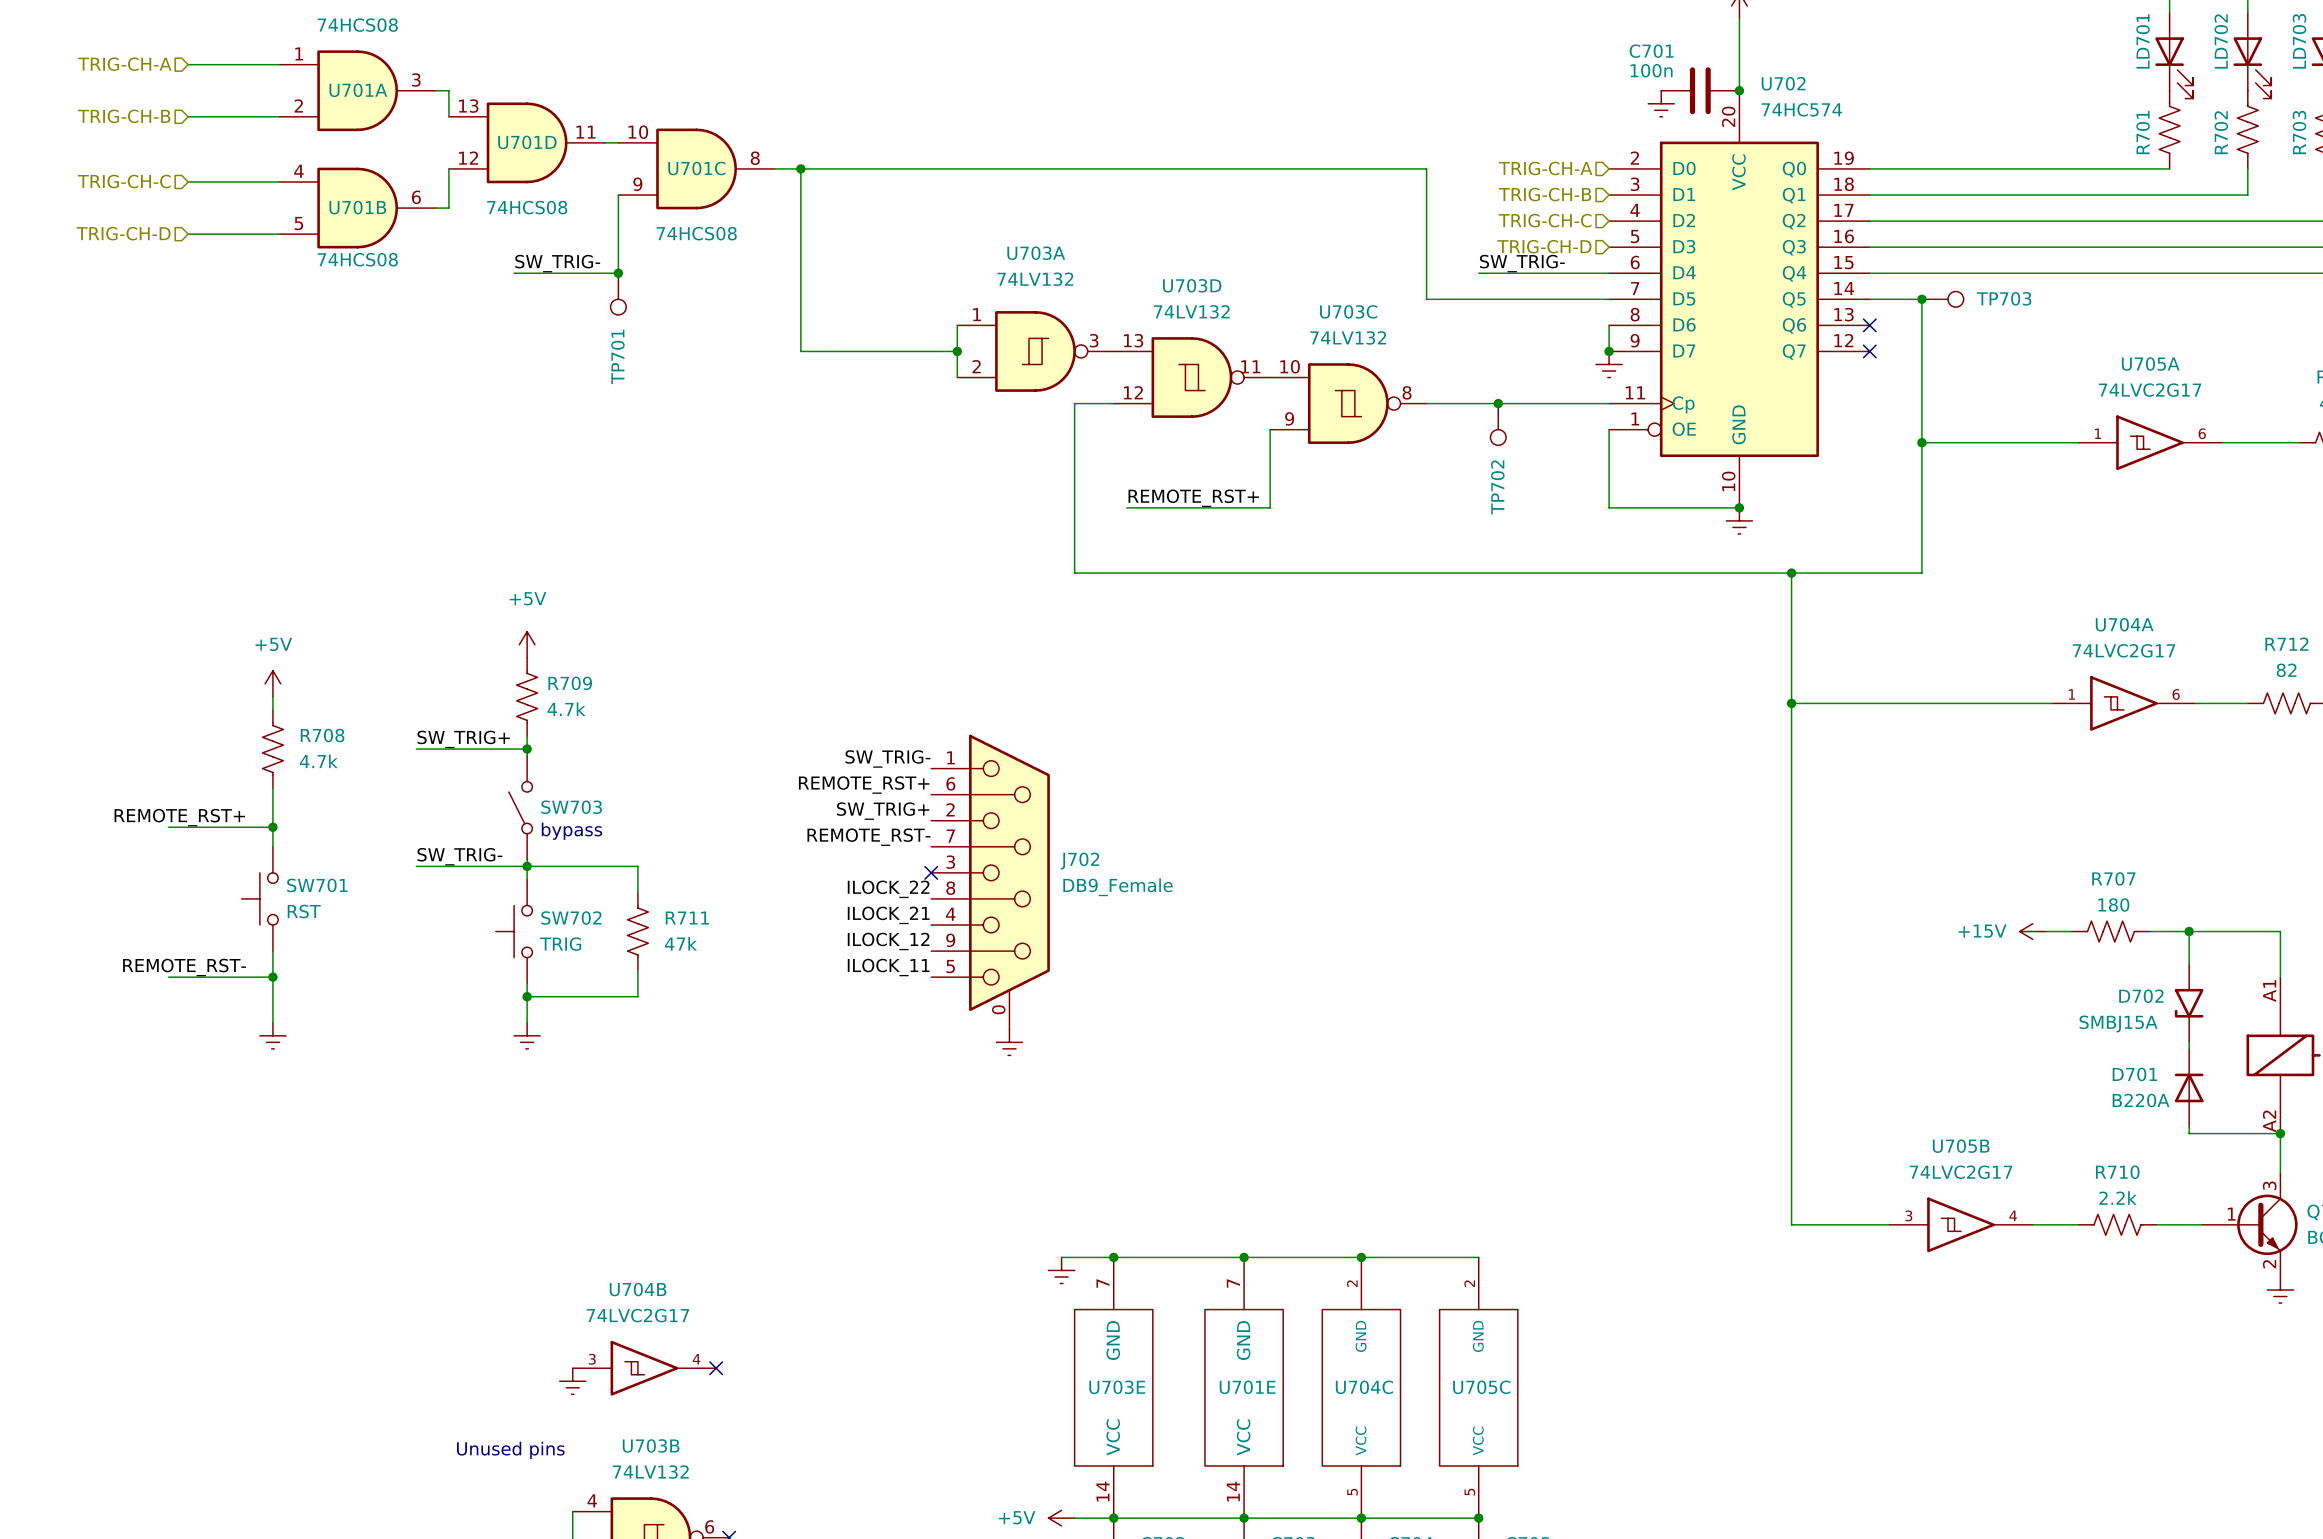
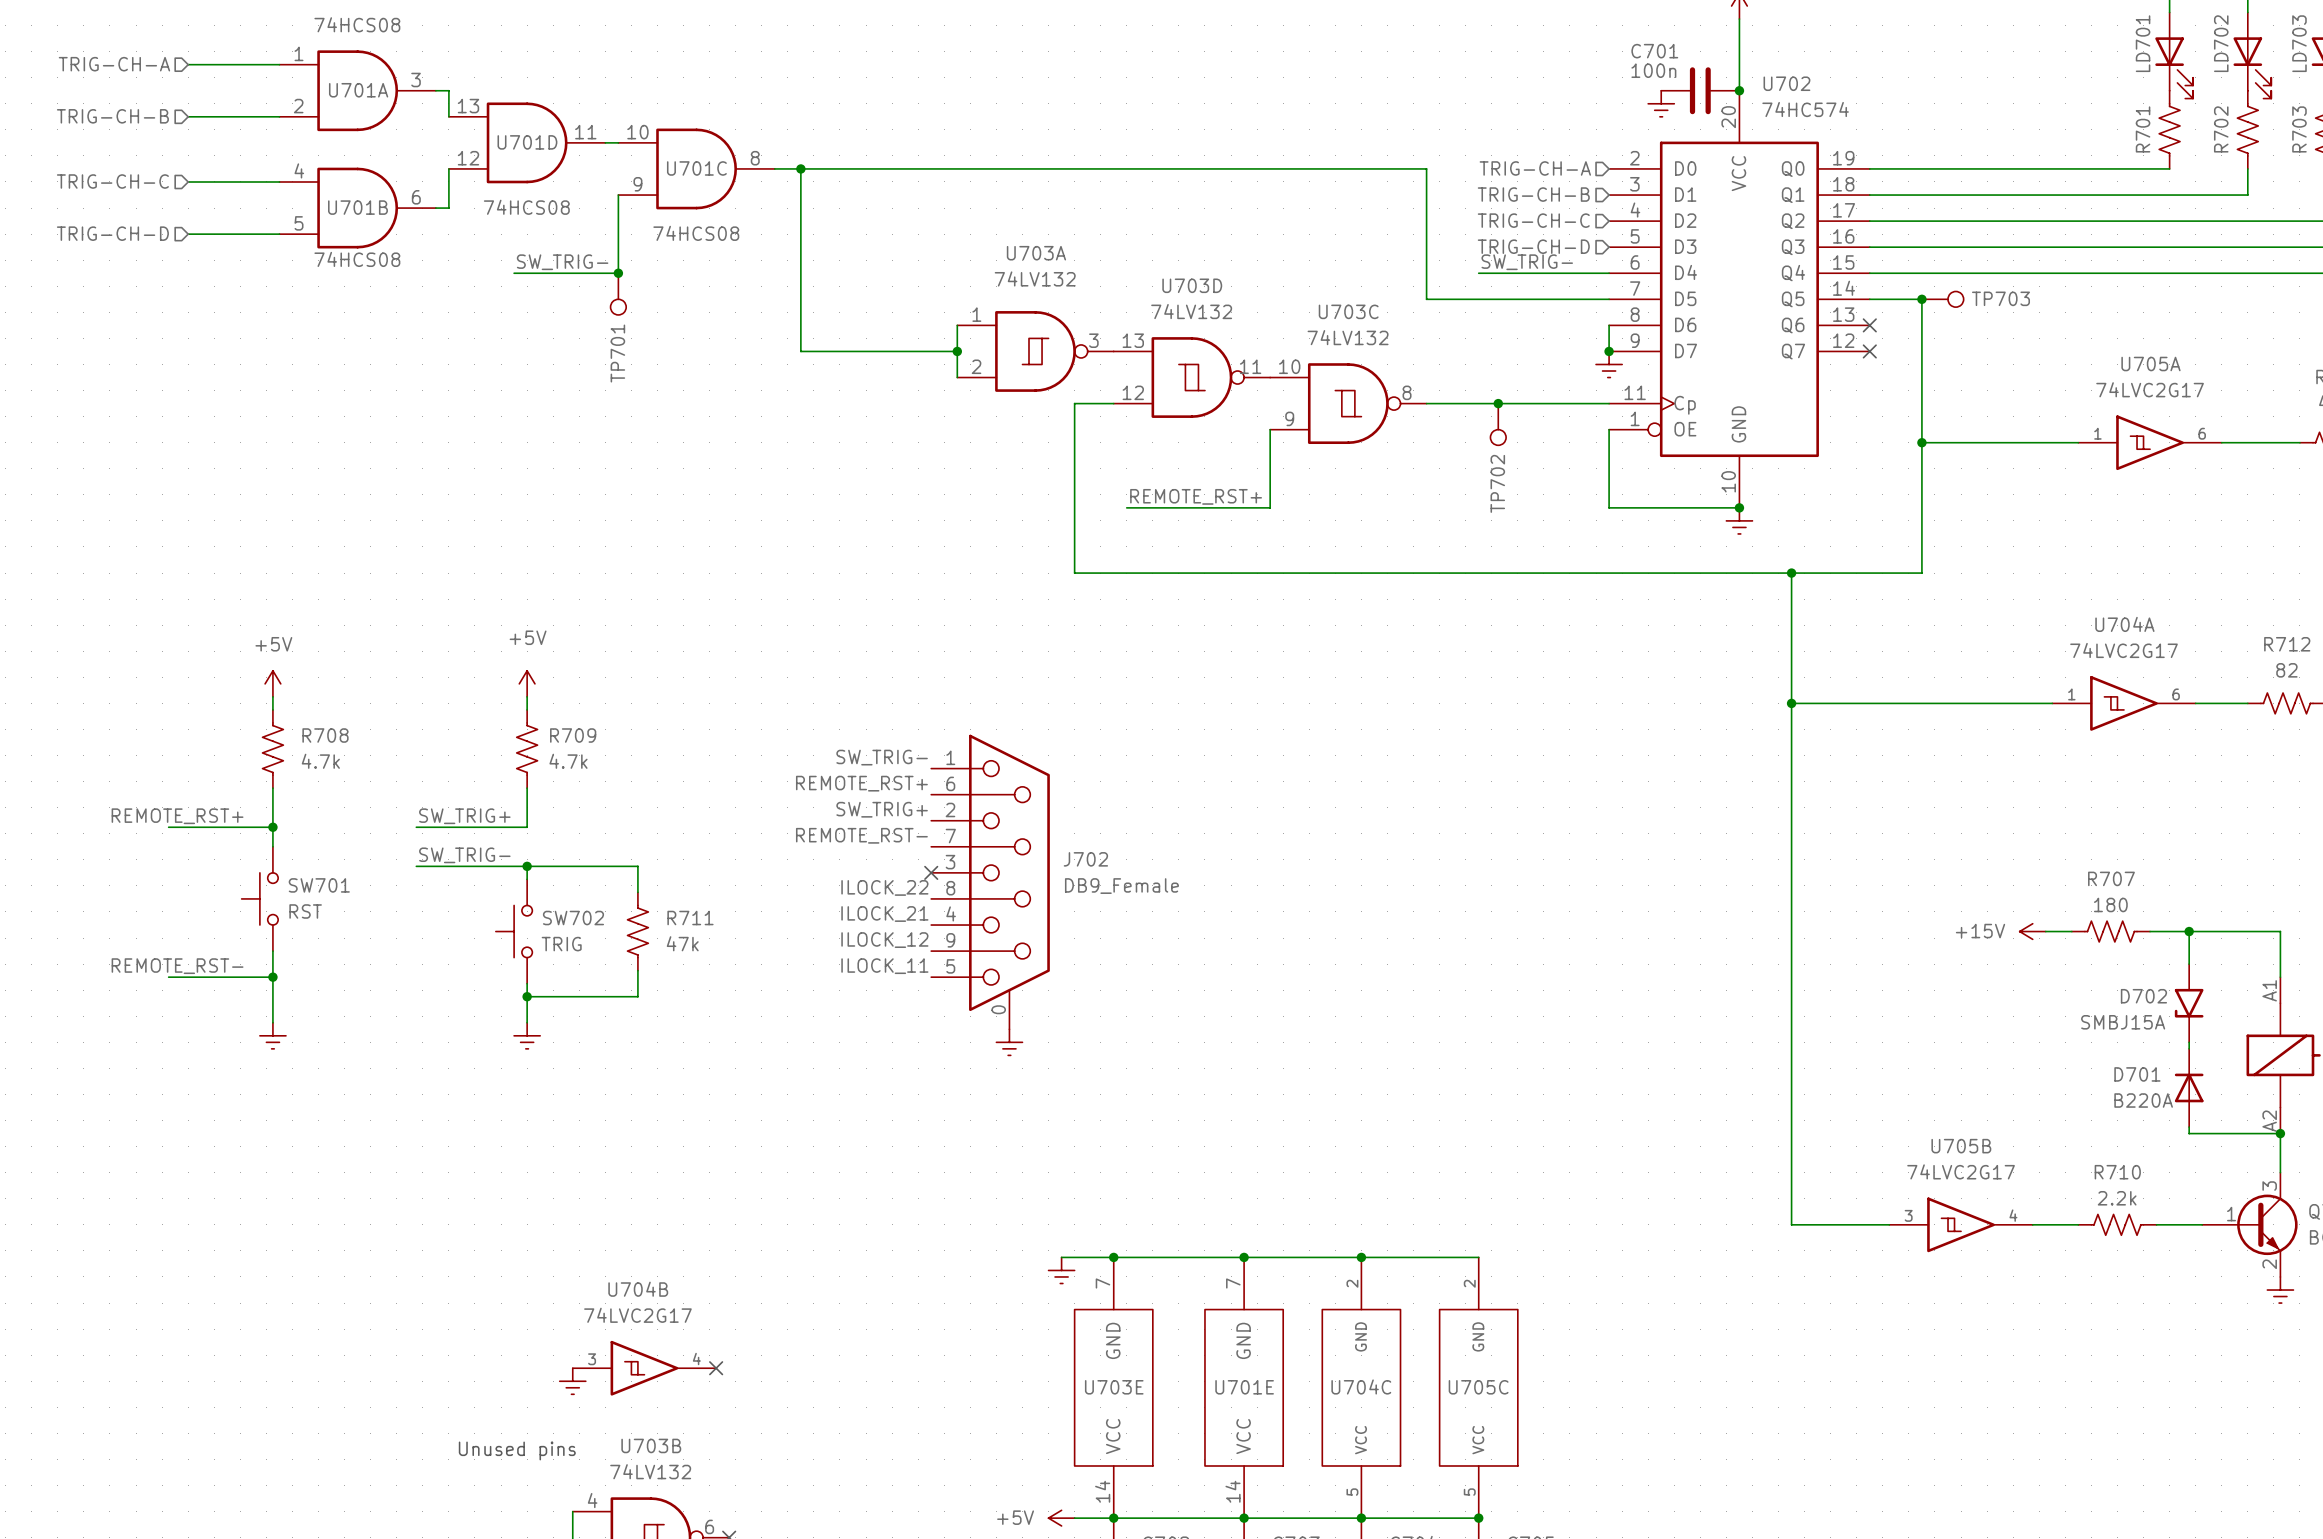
power symbol position: +5V (527, 644) -> +5V (527, 683)
wire: none -> (527, 696) (527, 709)
R709 position: (527, 696) -> (527, 749)
wire: (527, 736) (527, 755) -> none
label position: SW_TRIG+ (463, 739) -> SW_TRIG+ (464, 816)
wire: (416, 749) (527, 749) -> none
junction: (527, 749) -> none
wire: none -> (527, 788) (527, 827) (416, 827)
SW703: (520, 807) -> none
text: bypass (571, 831) -> none

